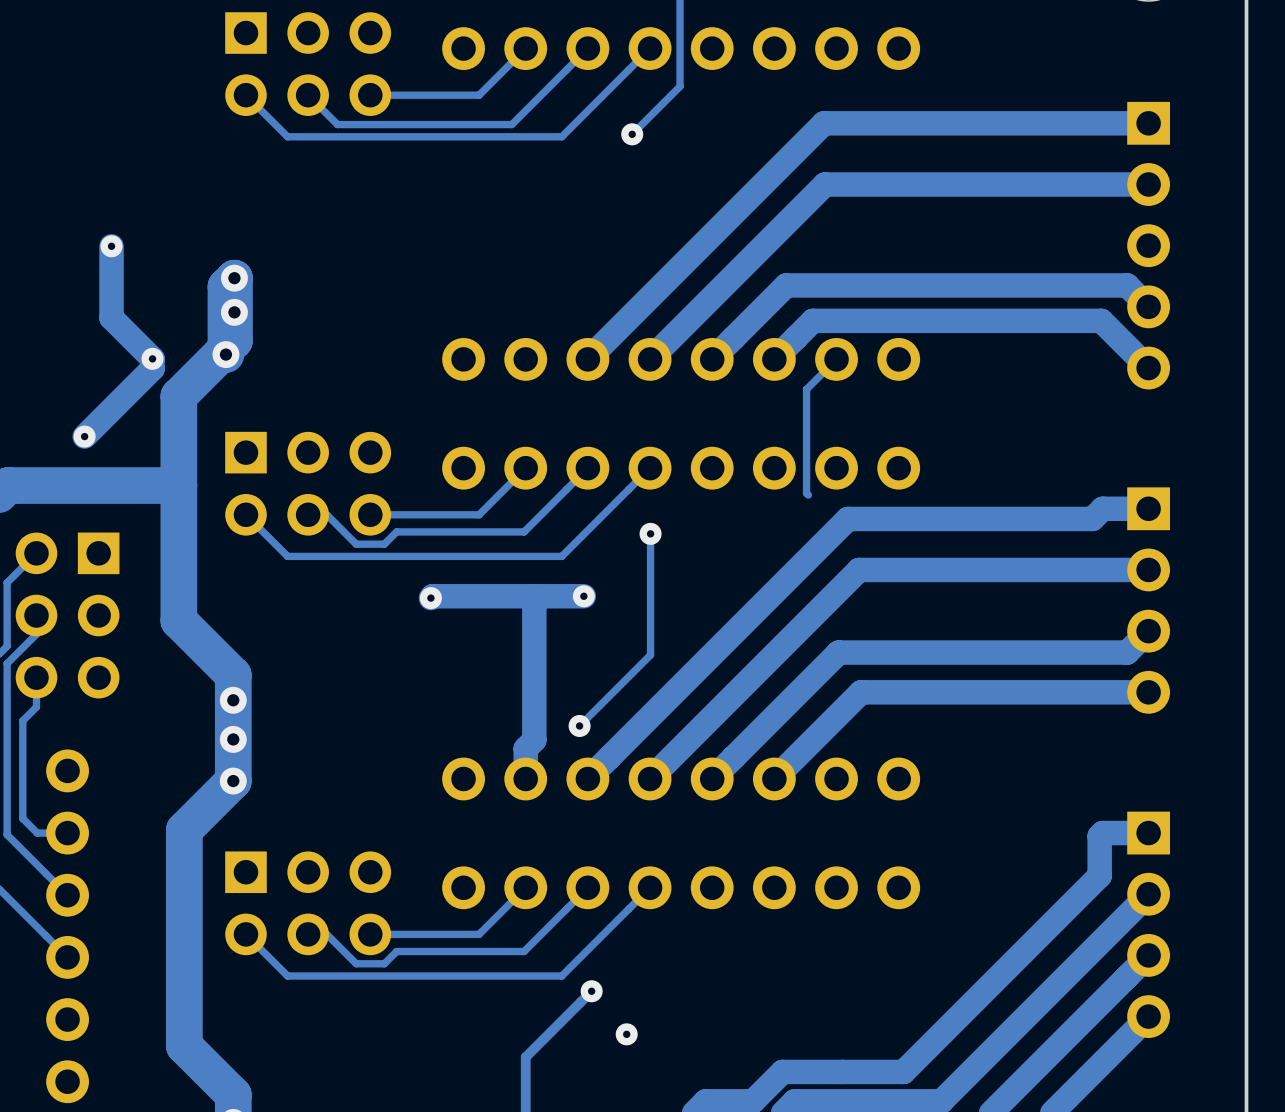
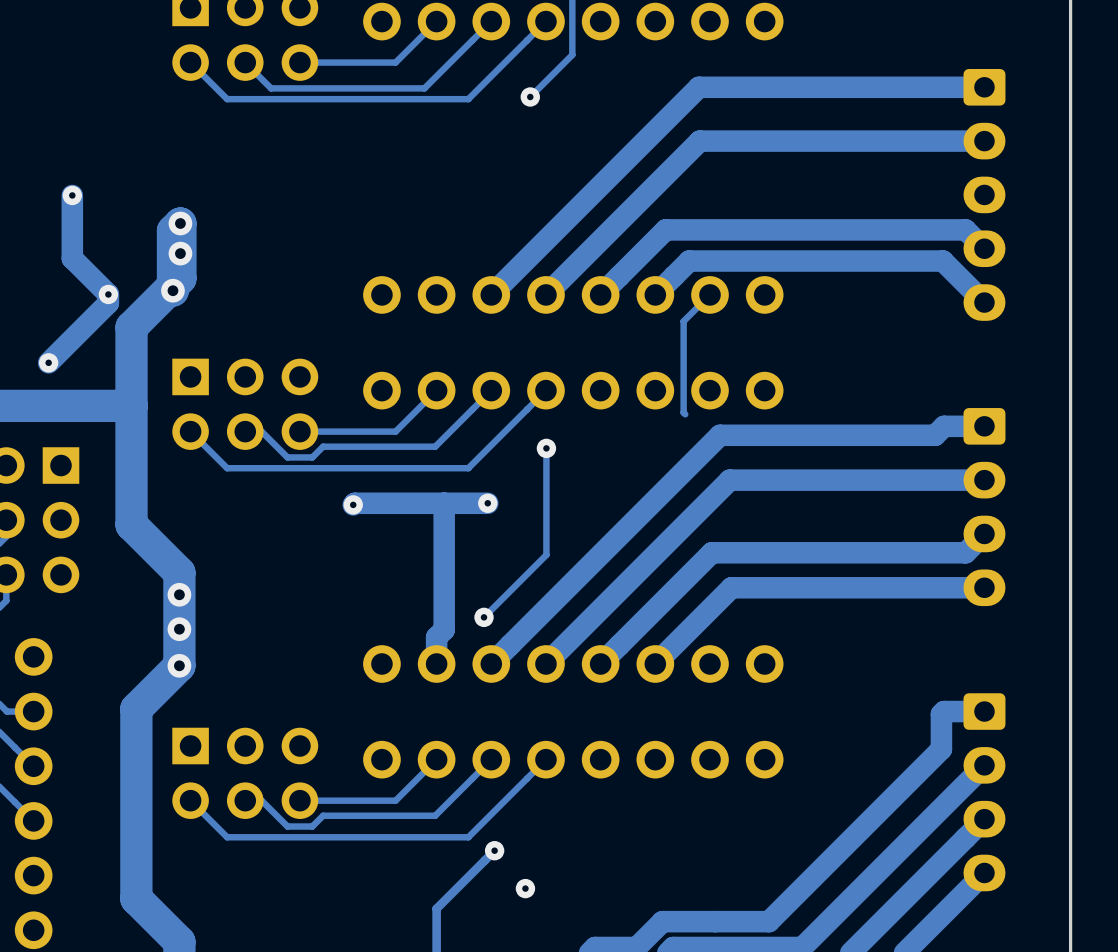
part footprint: [1127, 101, 1171, 390] -> [963, 69, 1006, 321]
part footprint: [1127, 487, 1171, 714] -> [963, 408, 1006, 607]
part footprint: [1127, 811, 1171, 1039] -> [963, 693, 1006, 892]

